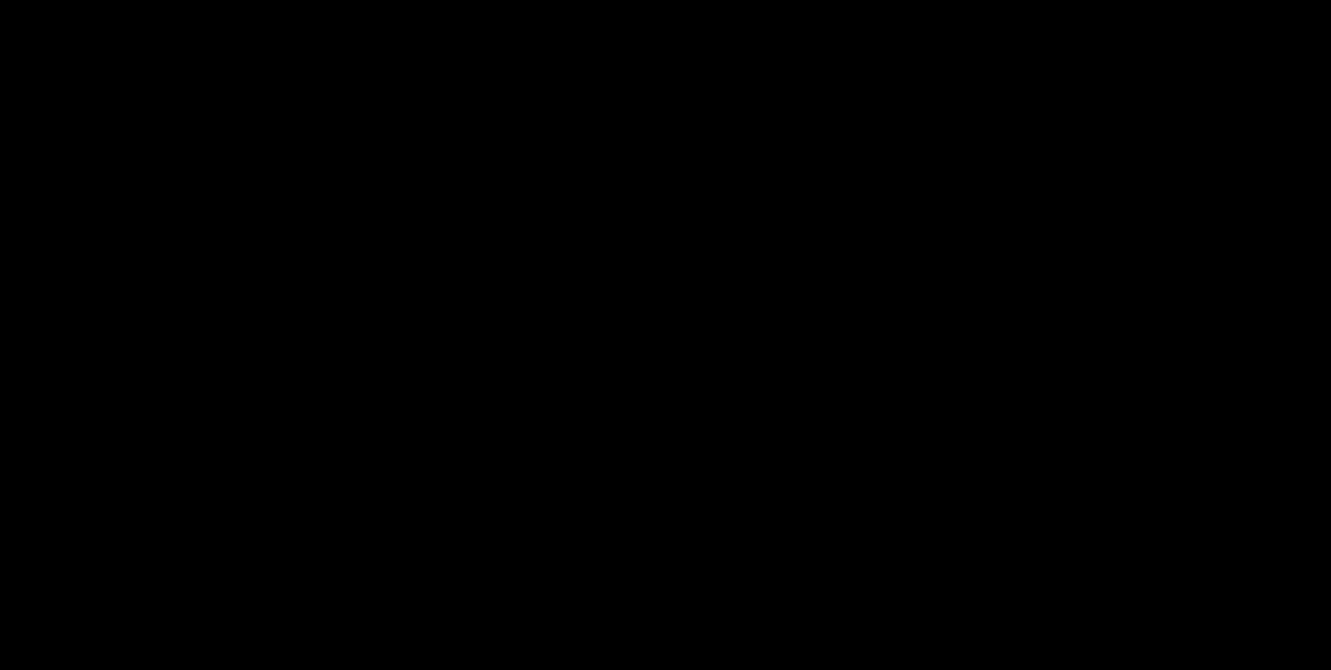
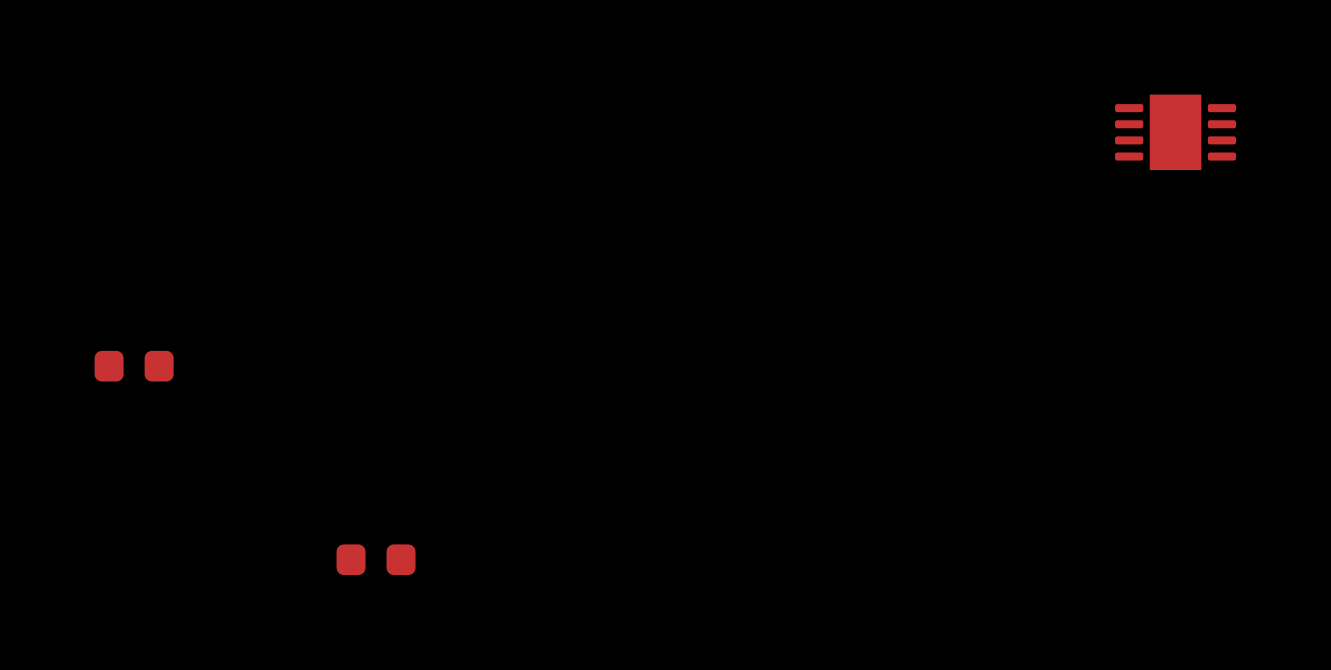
part: none -> (1175, 132)
part: none -> (134, 366)
part: none -> (376, 559)

